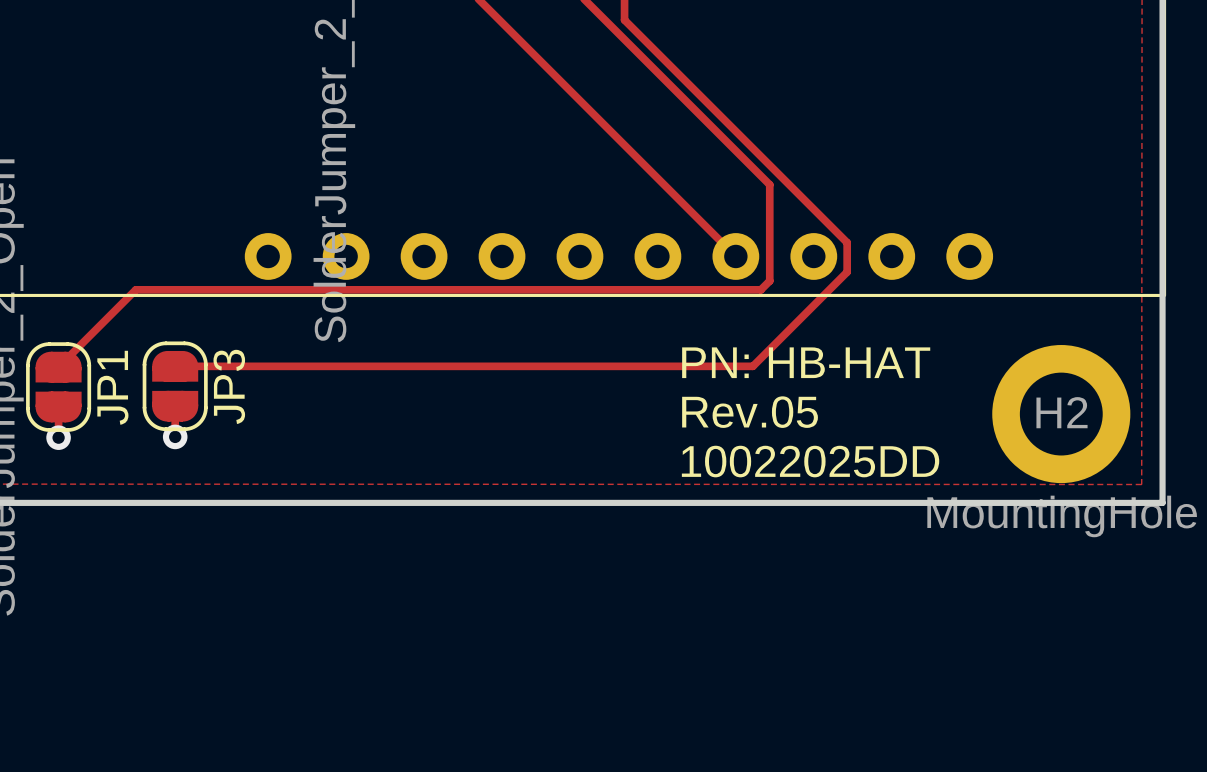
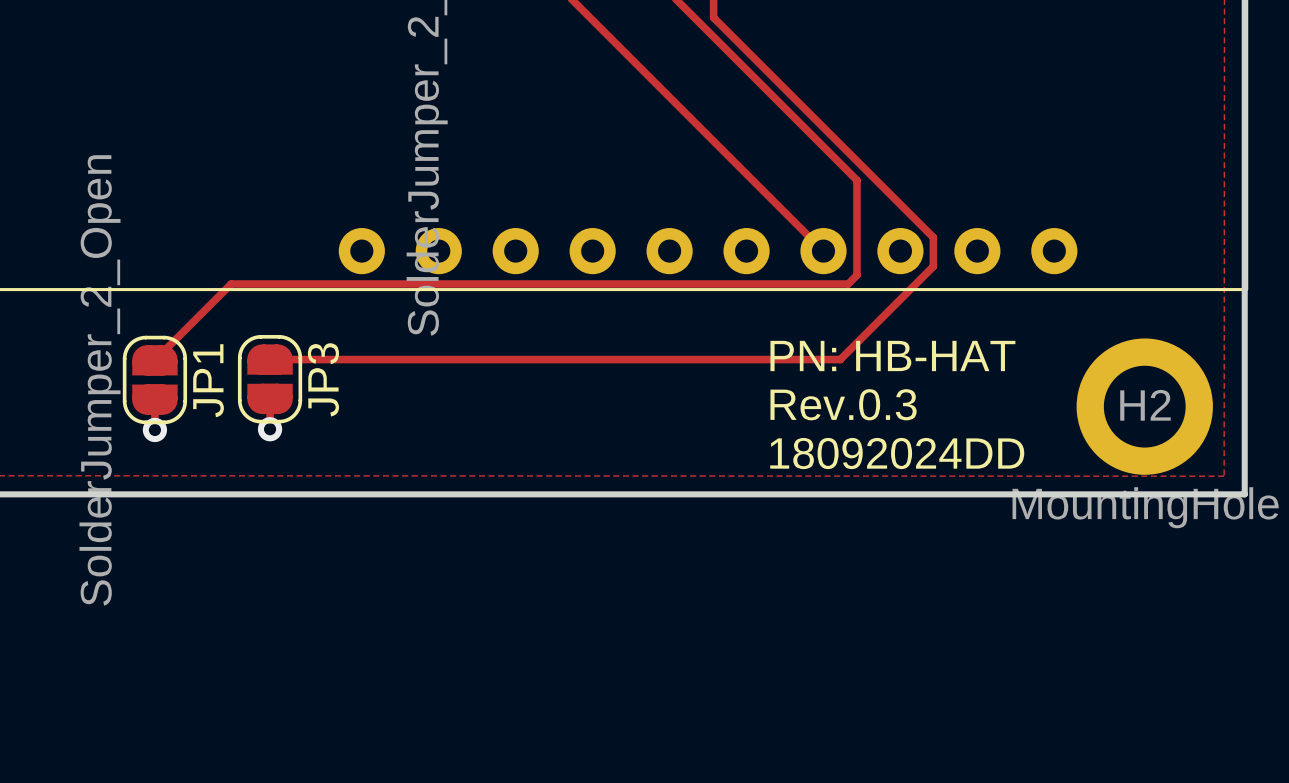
text: Rev.05 (750, 412) -> Rev.0.3 (843, 404)
text: 10022025DD (810, 461) -> 18092024DD (897, 453)

